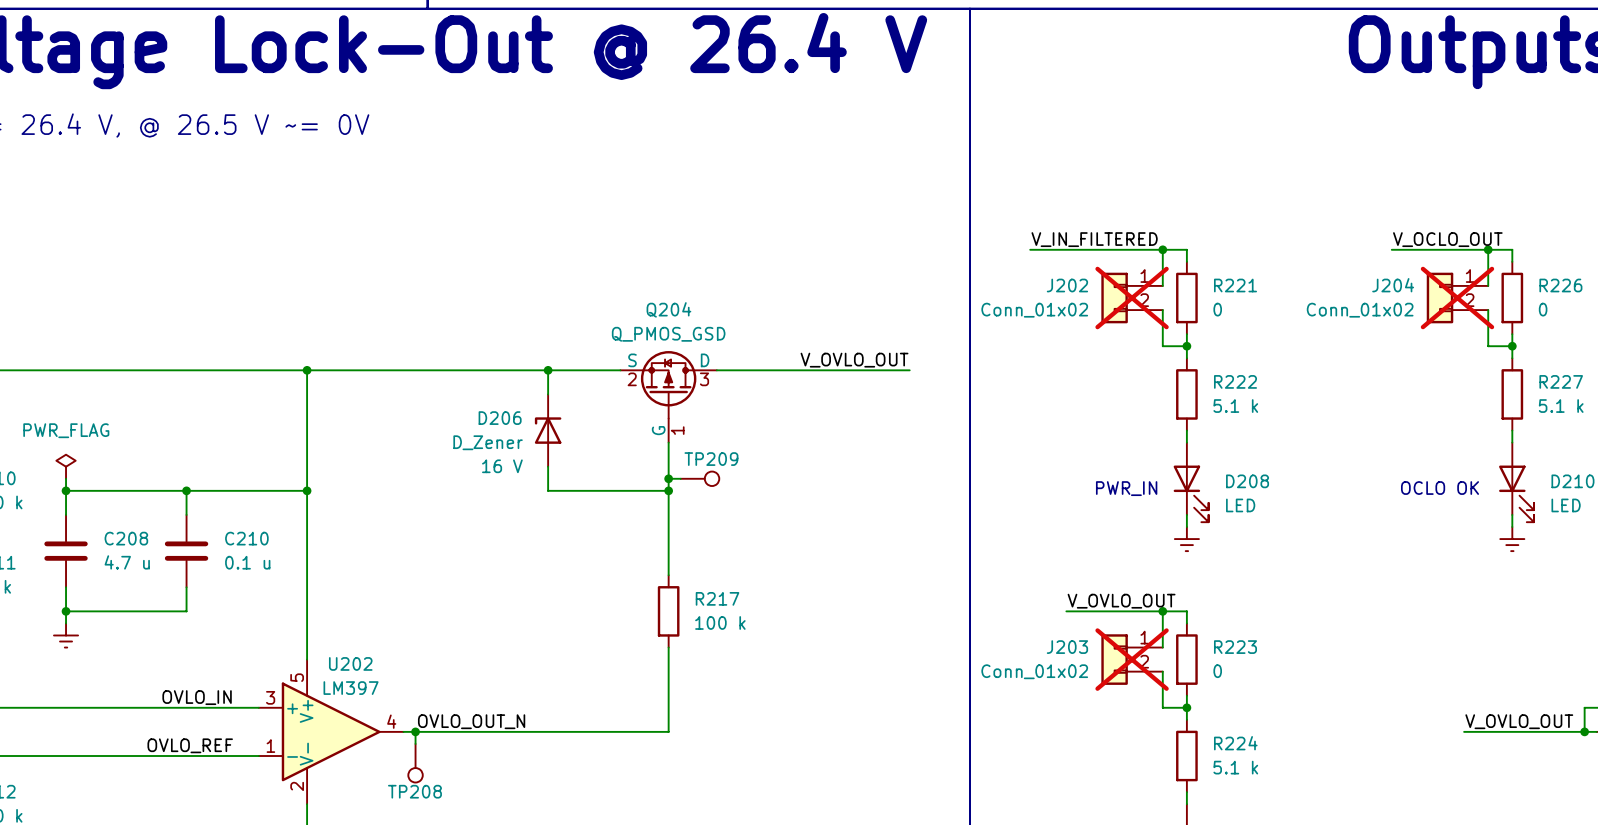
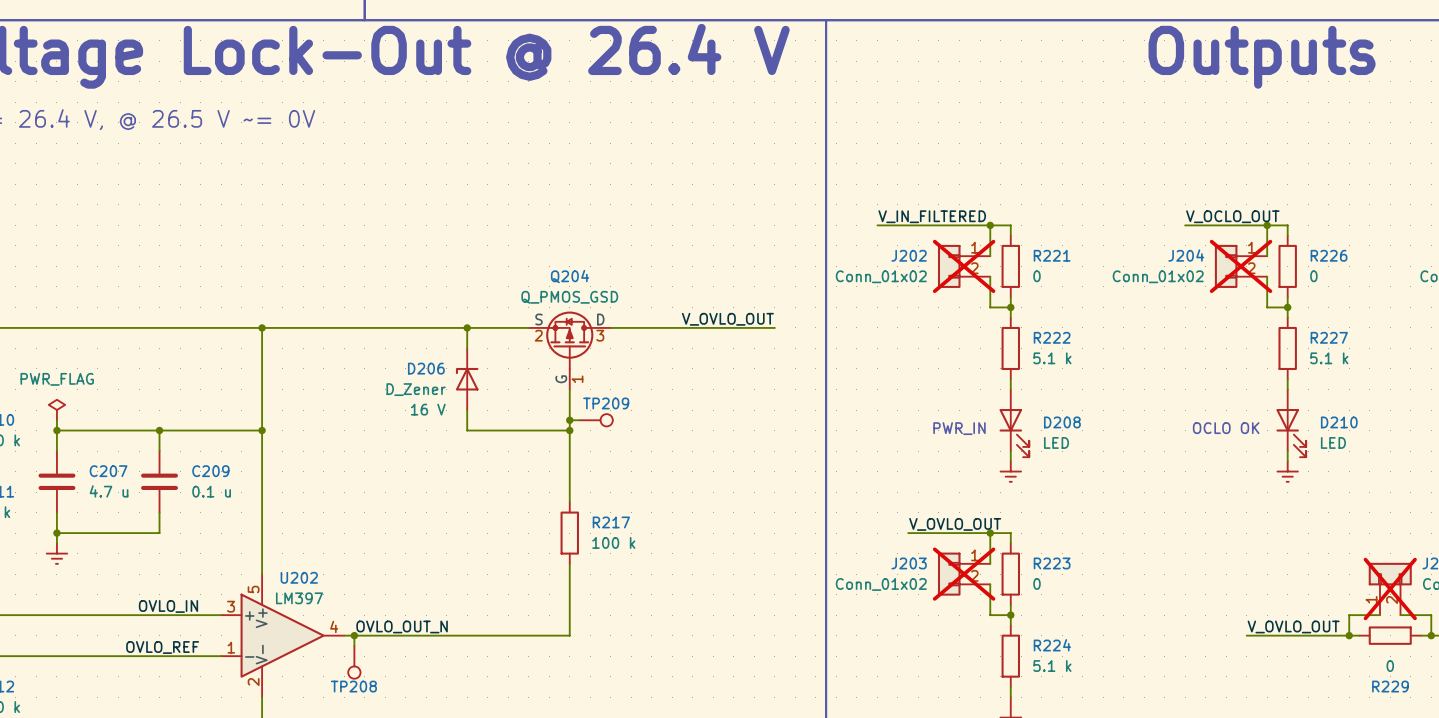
C208 name: C208 (126, 538) -> C207 (108, 471)
C210 name: C210 (246, 538) -> C209 (210, 471)

